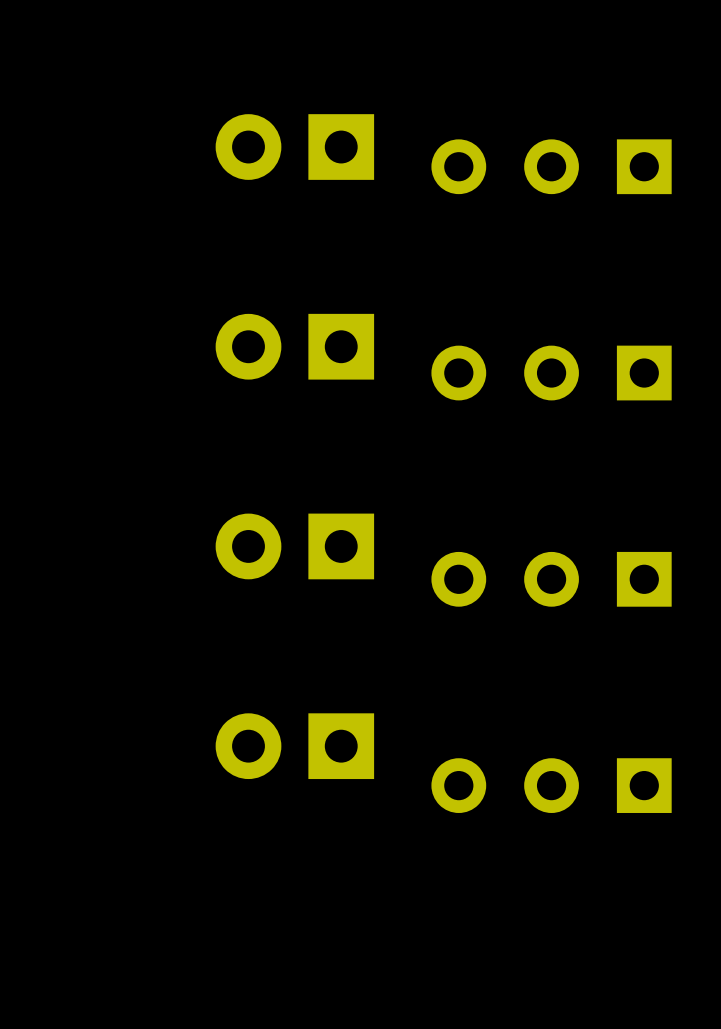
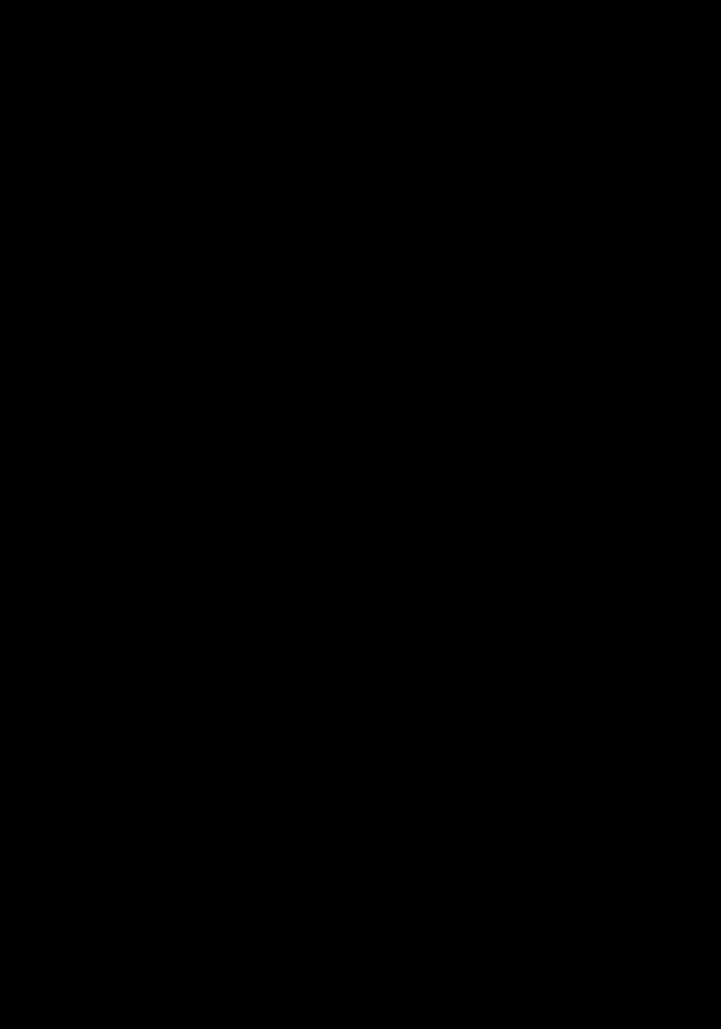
part: (294, 147) -> none
part: (551, 166) -> none
part: (294, 346) -> none
part: (551, 373) -> none
part: (294, 546) -> none
part: (551, 579) -> none
part: (294, 746) -> none
part: (551, 785) -> none

